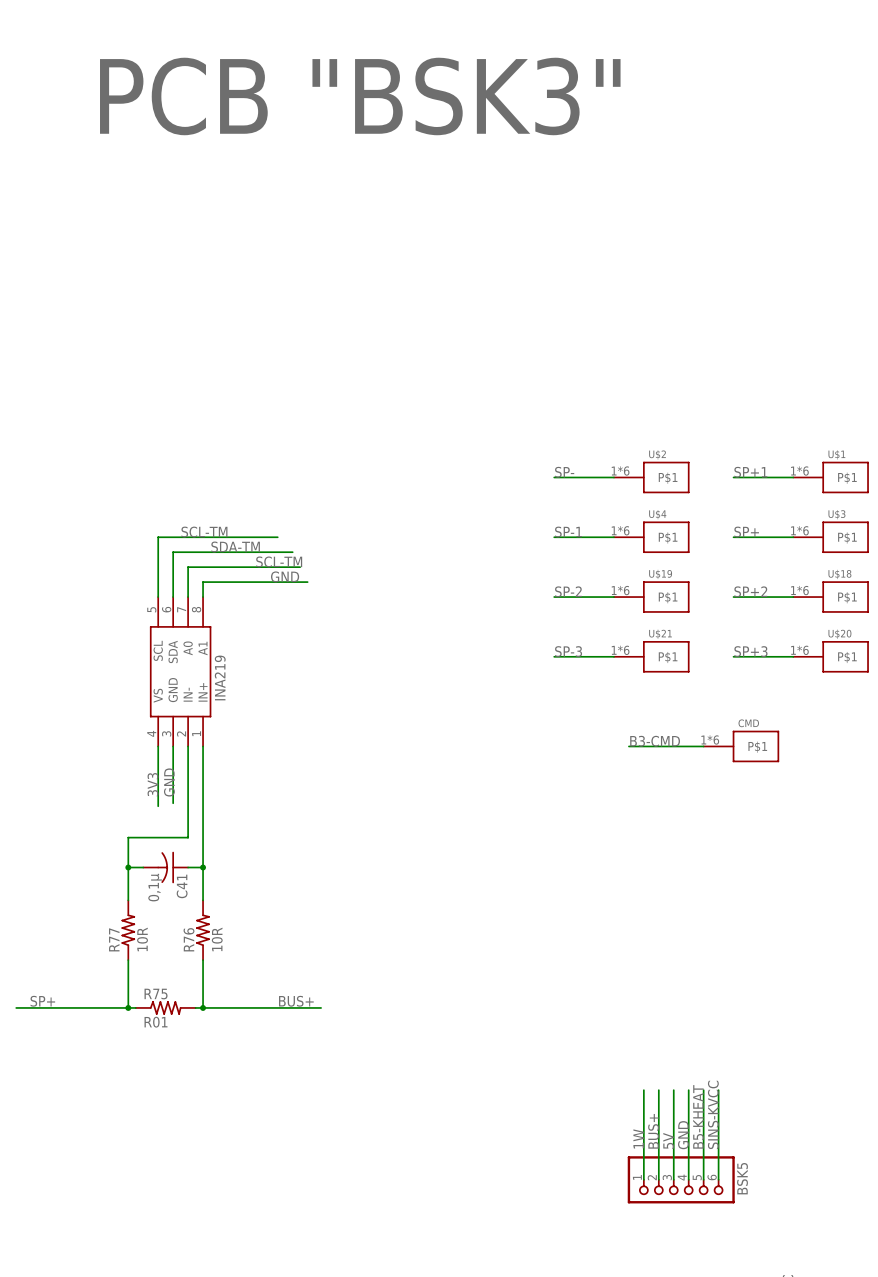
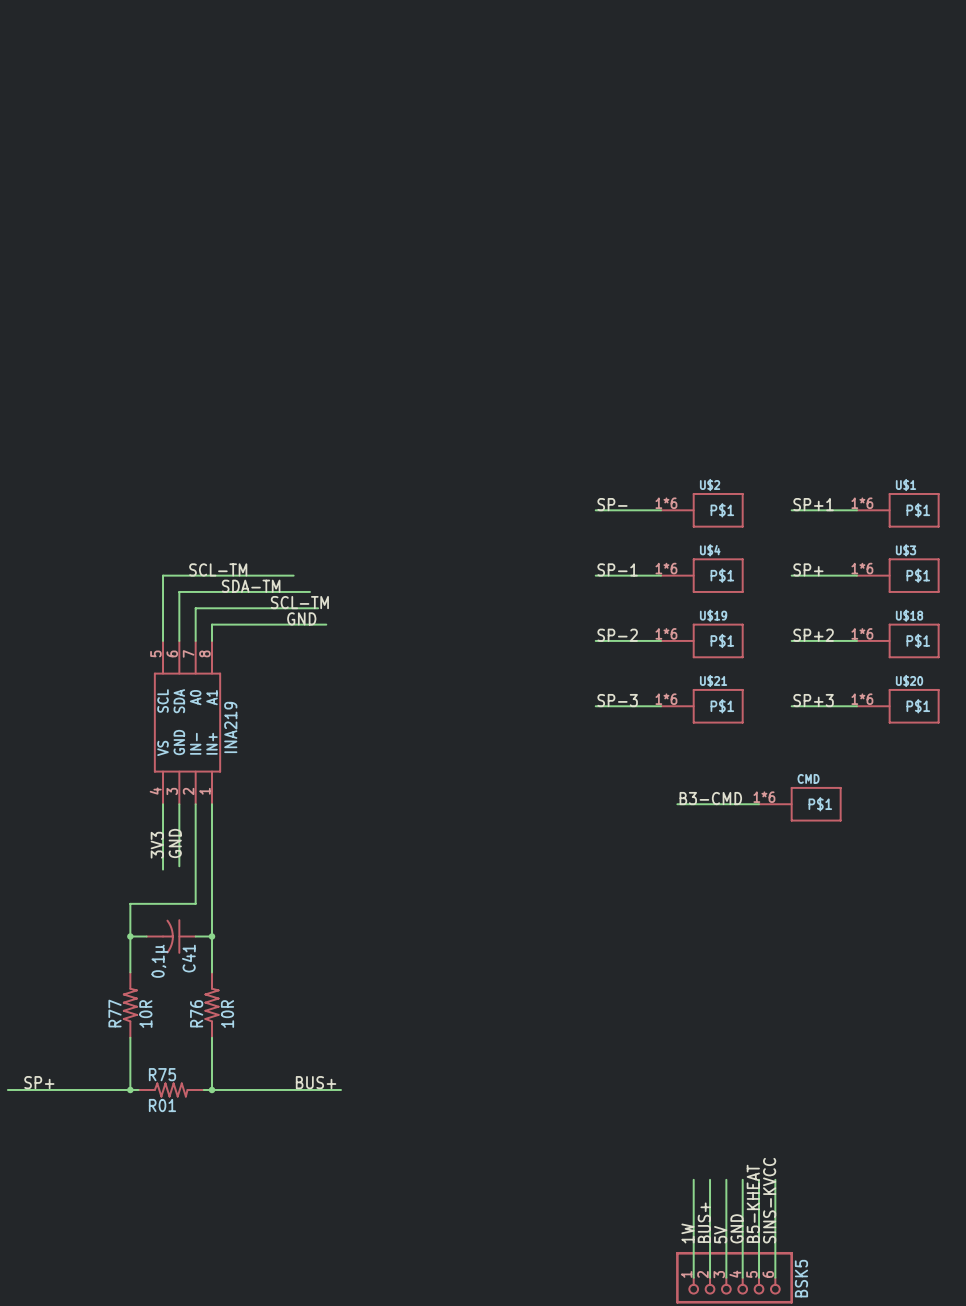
part: PCB "BSK3" (360, 96) -> none

